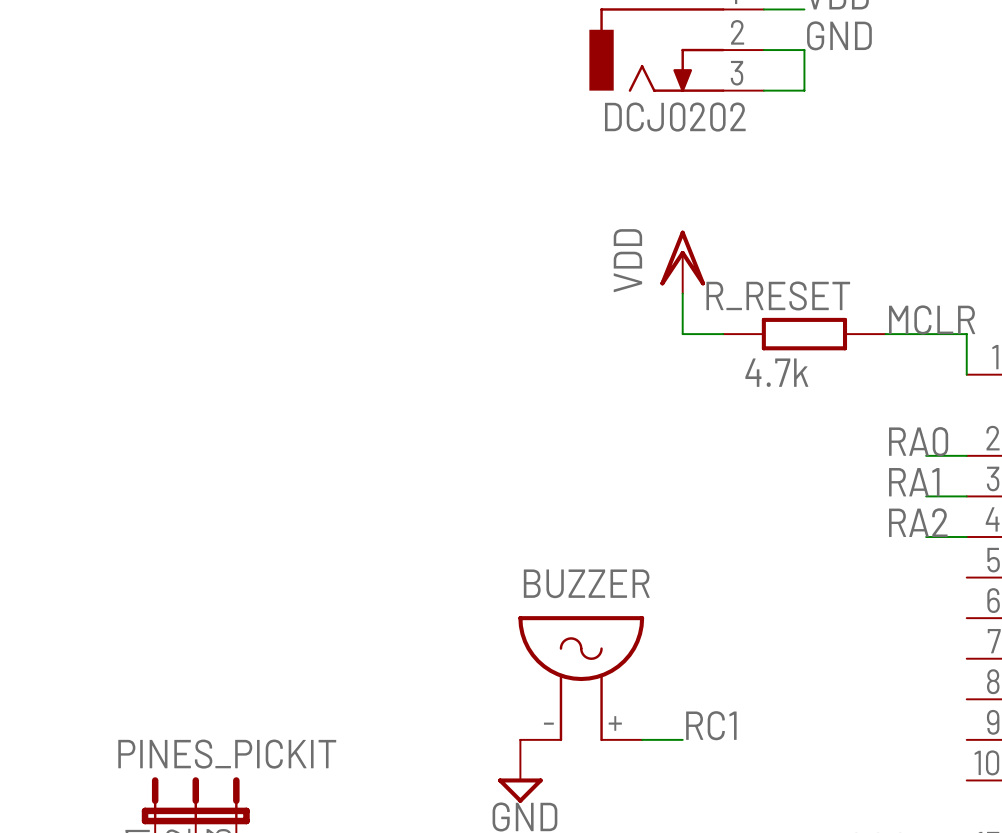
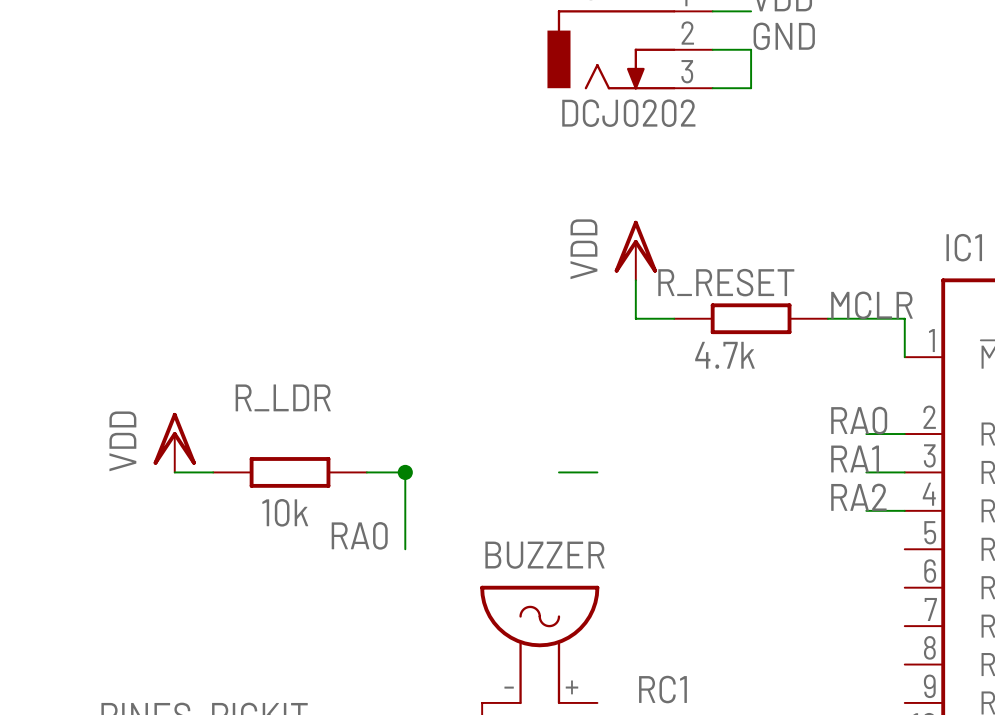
power symbol: none -> VDD (174, 442)
wire: none -> (174, 472) (213, 472)
R_LDR: none -> 10k (290, 472)
wire: none -> (366, 472) (405, 472) (405, 549)
junction: none -> (405, 472)
label: none -> RA0 (359, 535)
wire: (642, 739) (682, 739) -> (558, 472) (597, 472)

